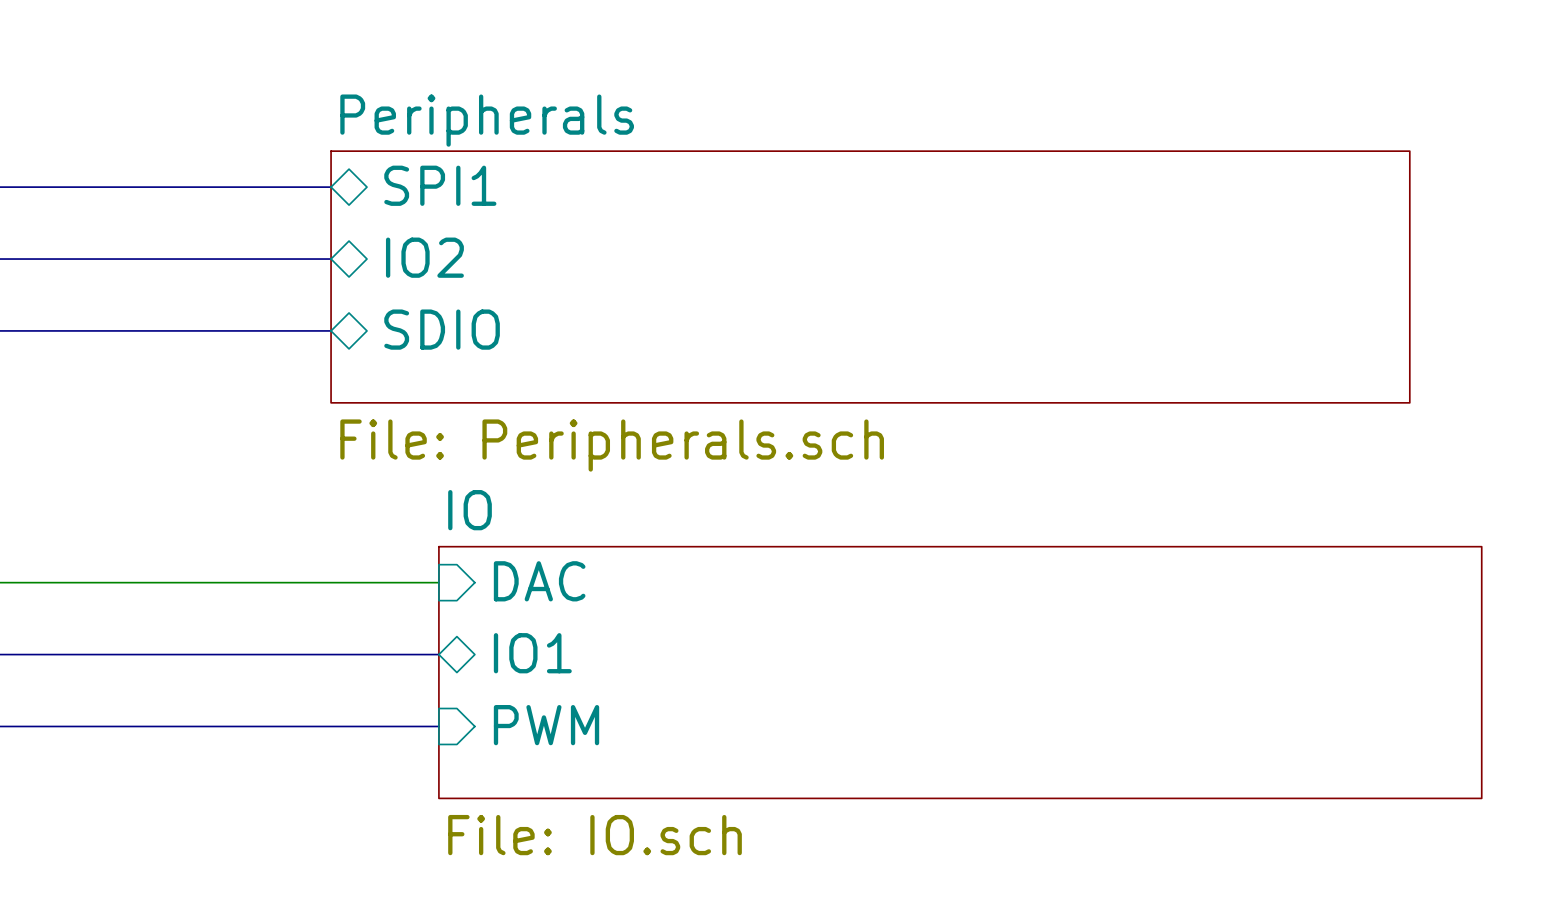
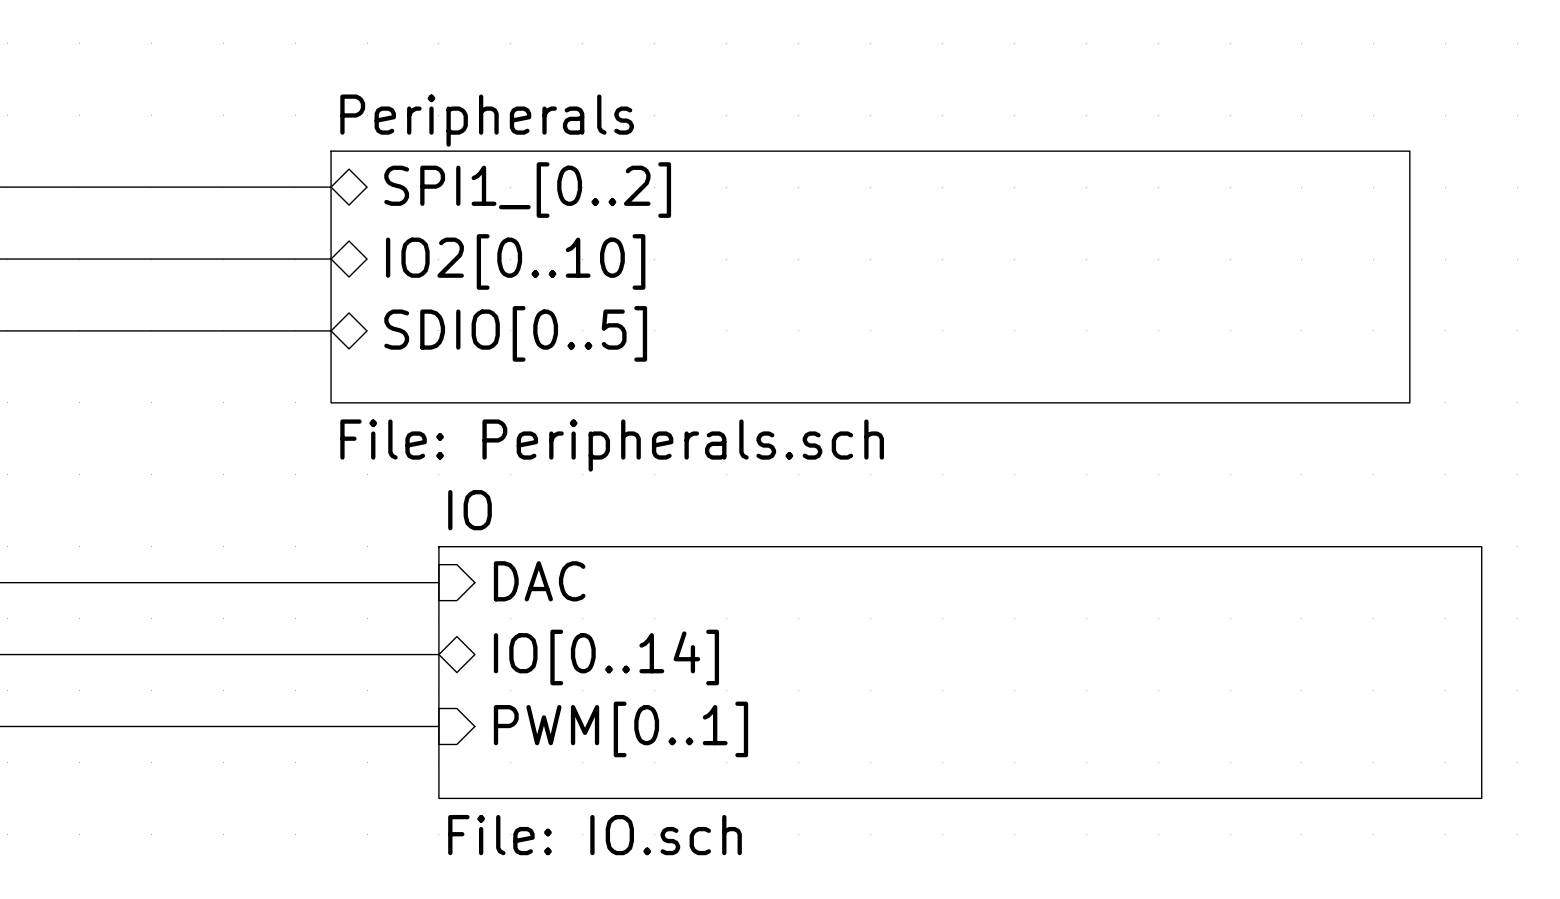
sheet pin: SPI1 (440, 185) -> SPI1_[0..2] (527, 190)
sheet pin: IO2 (424, 257) -> IO2[0..10] (515, 261)
sheet pin: SDIO (442, 329) -> SDIO[0..5] (515, 333)
sheet pin: IO1 (532, 653) -> IO[0..14] (606, 657)
sheet pin: PWM (546, 725) -> PWM[0..1] (620, 729)

